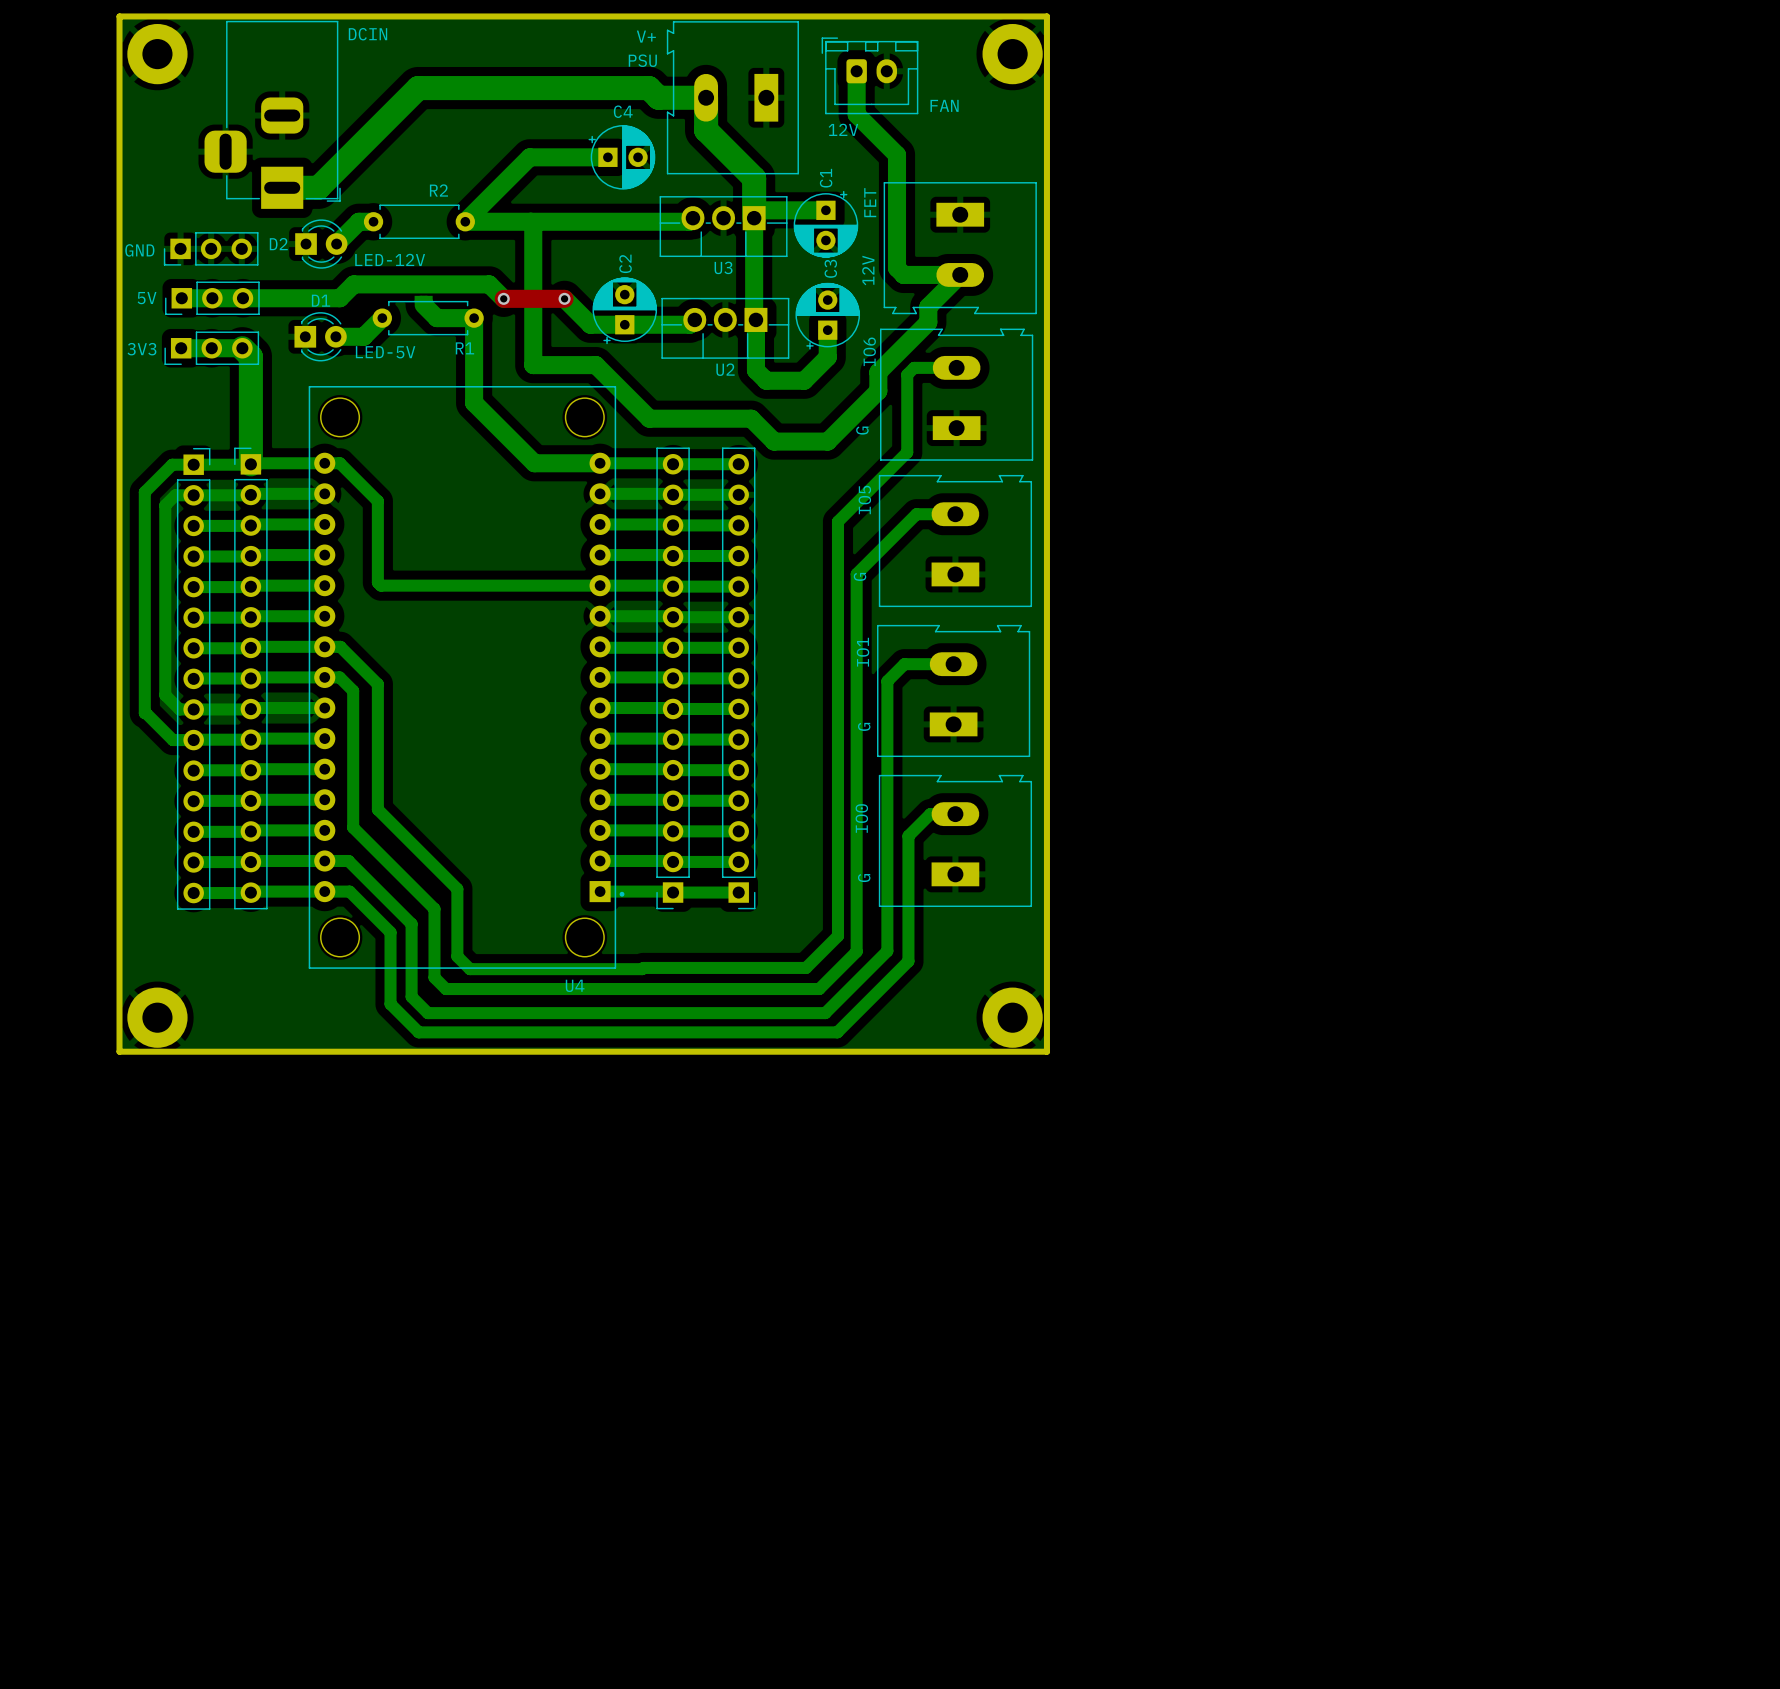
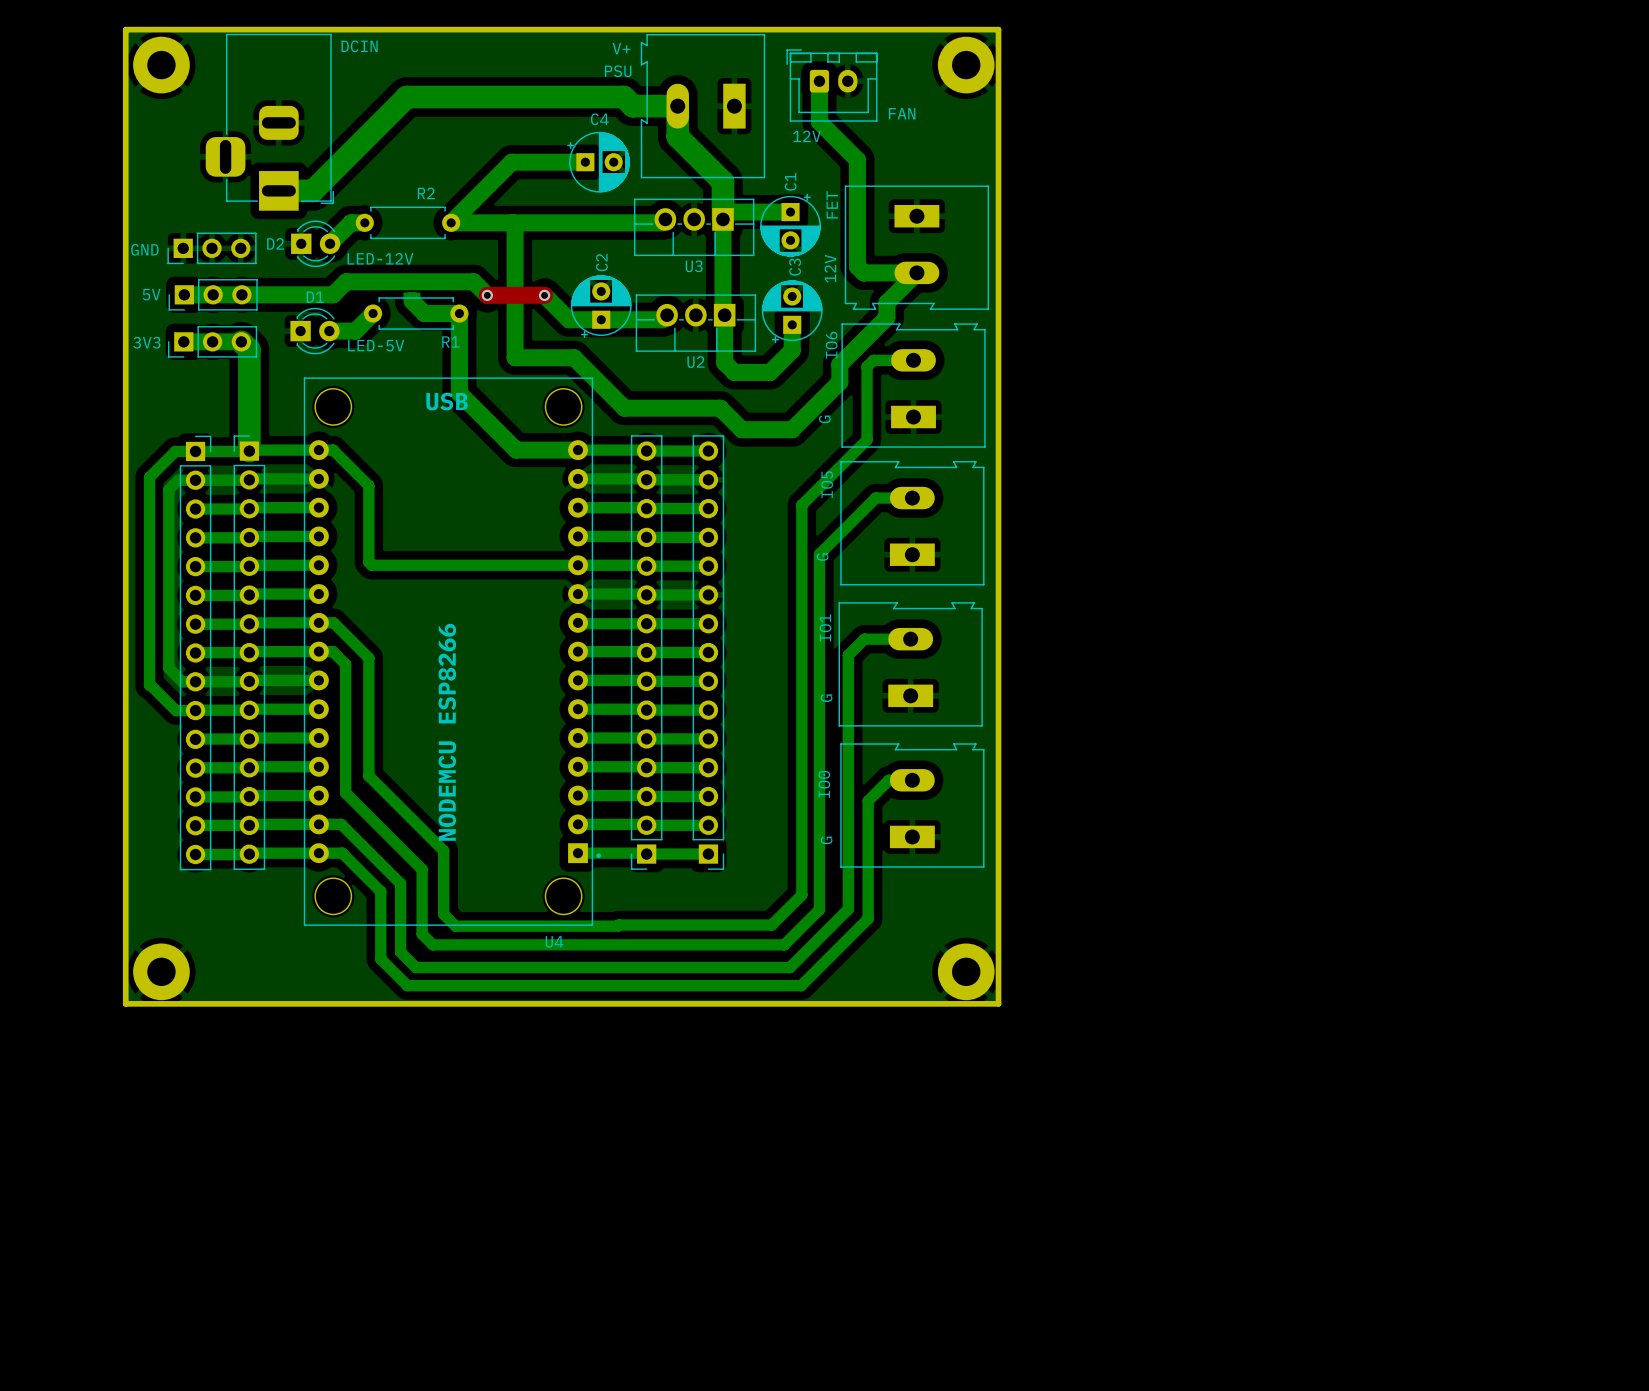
text: none -> USB (447, 401)
text: none -> NODEMCU ESP8266 (447, 732)

